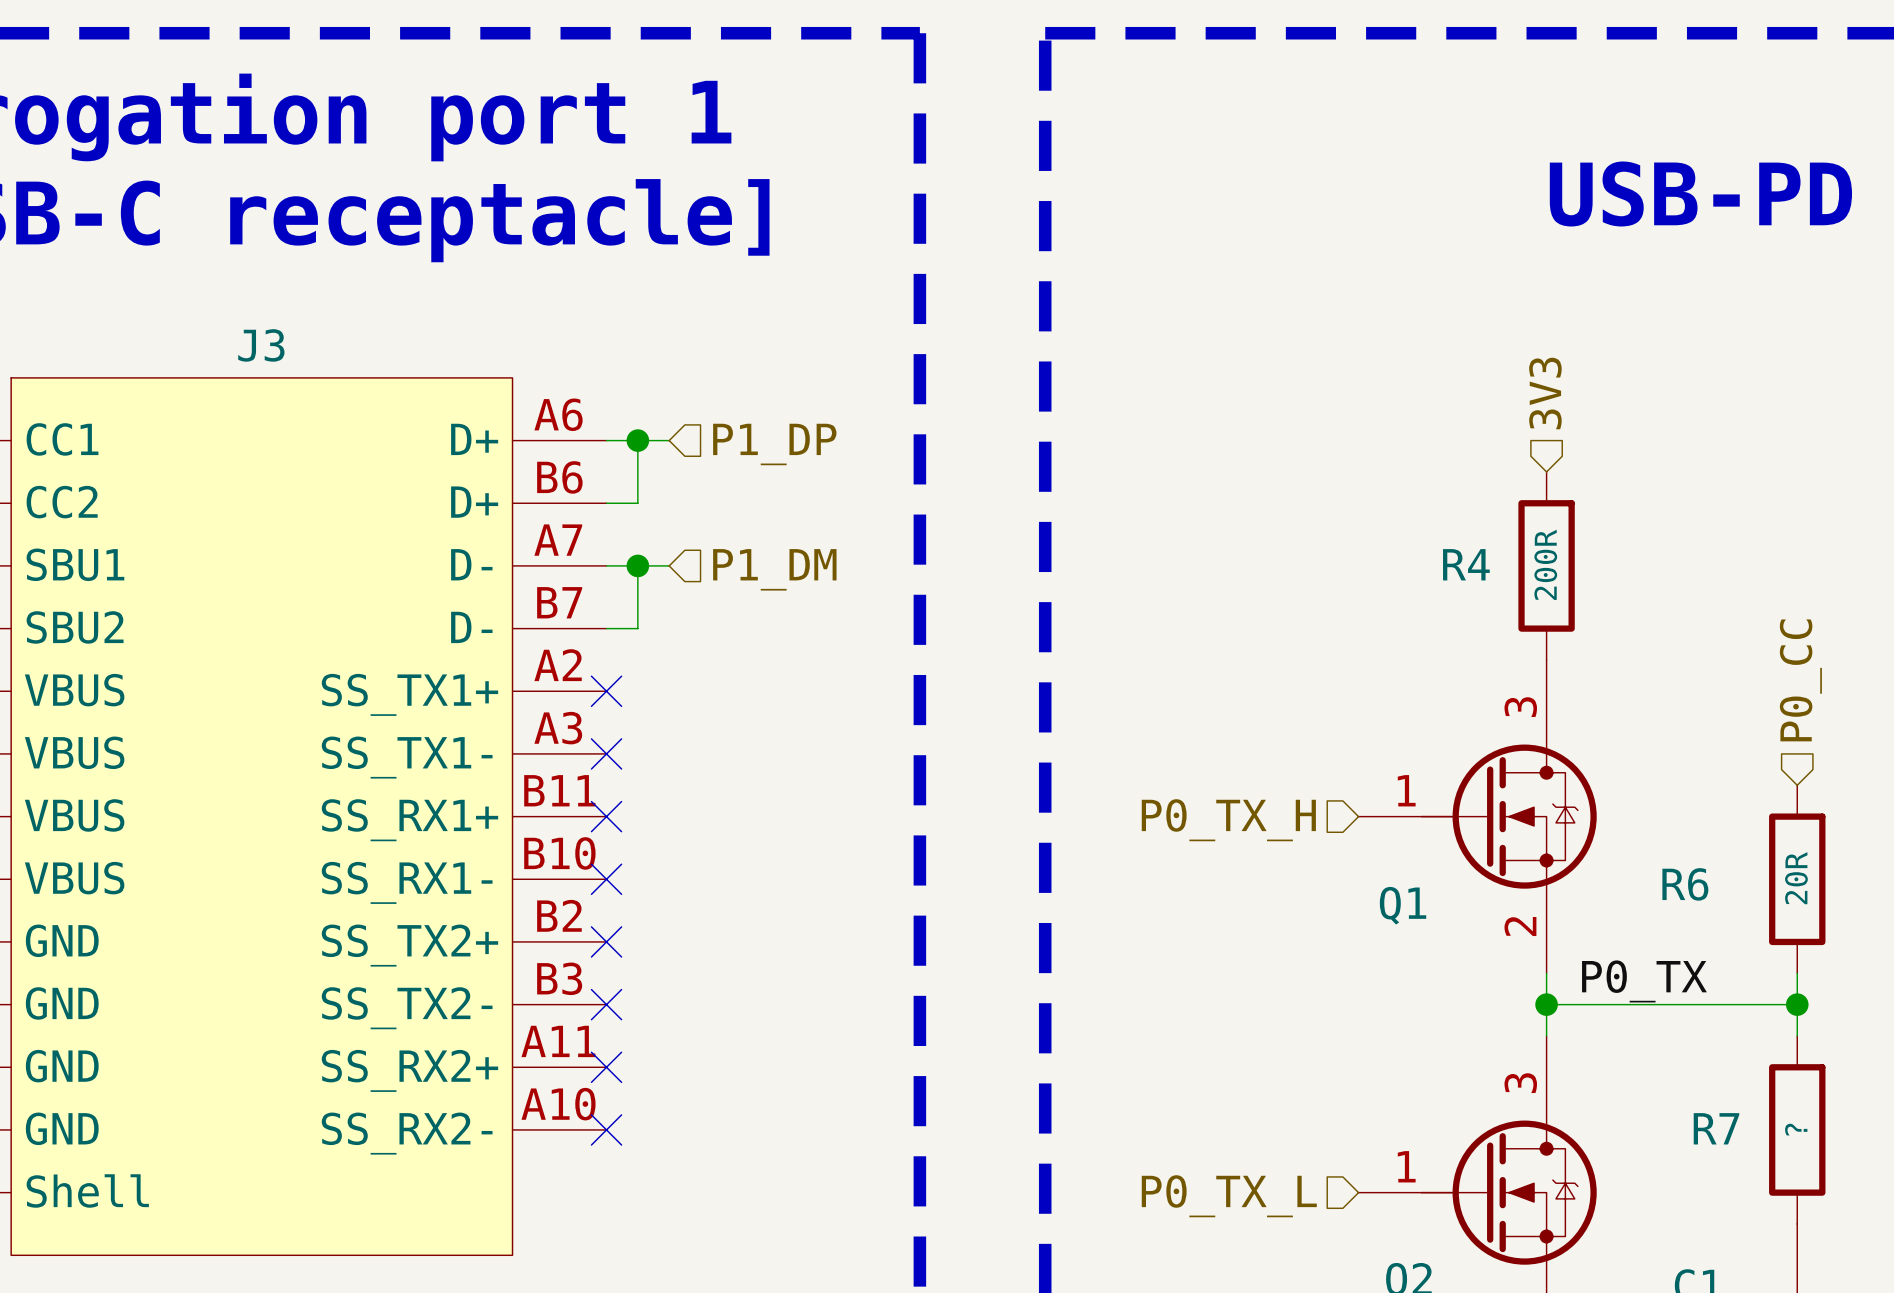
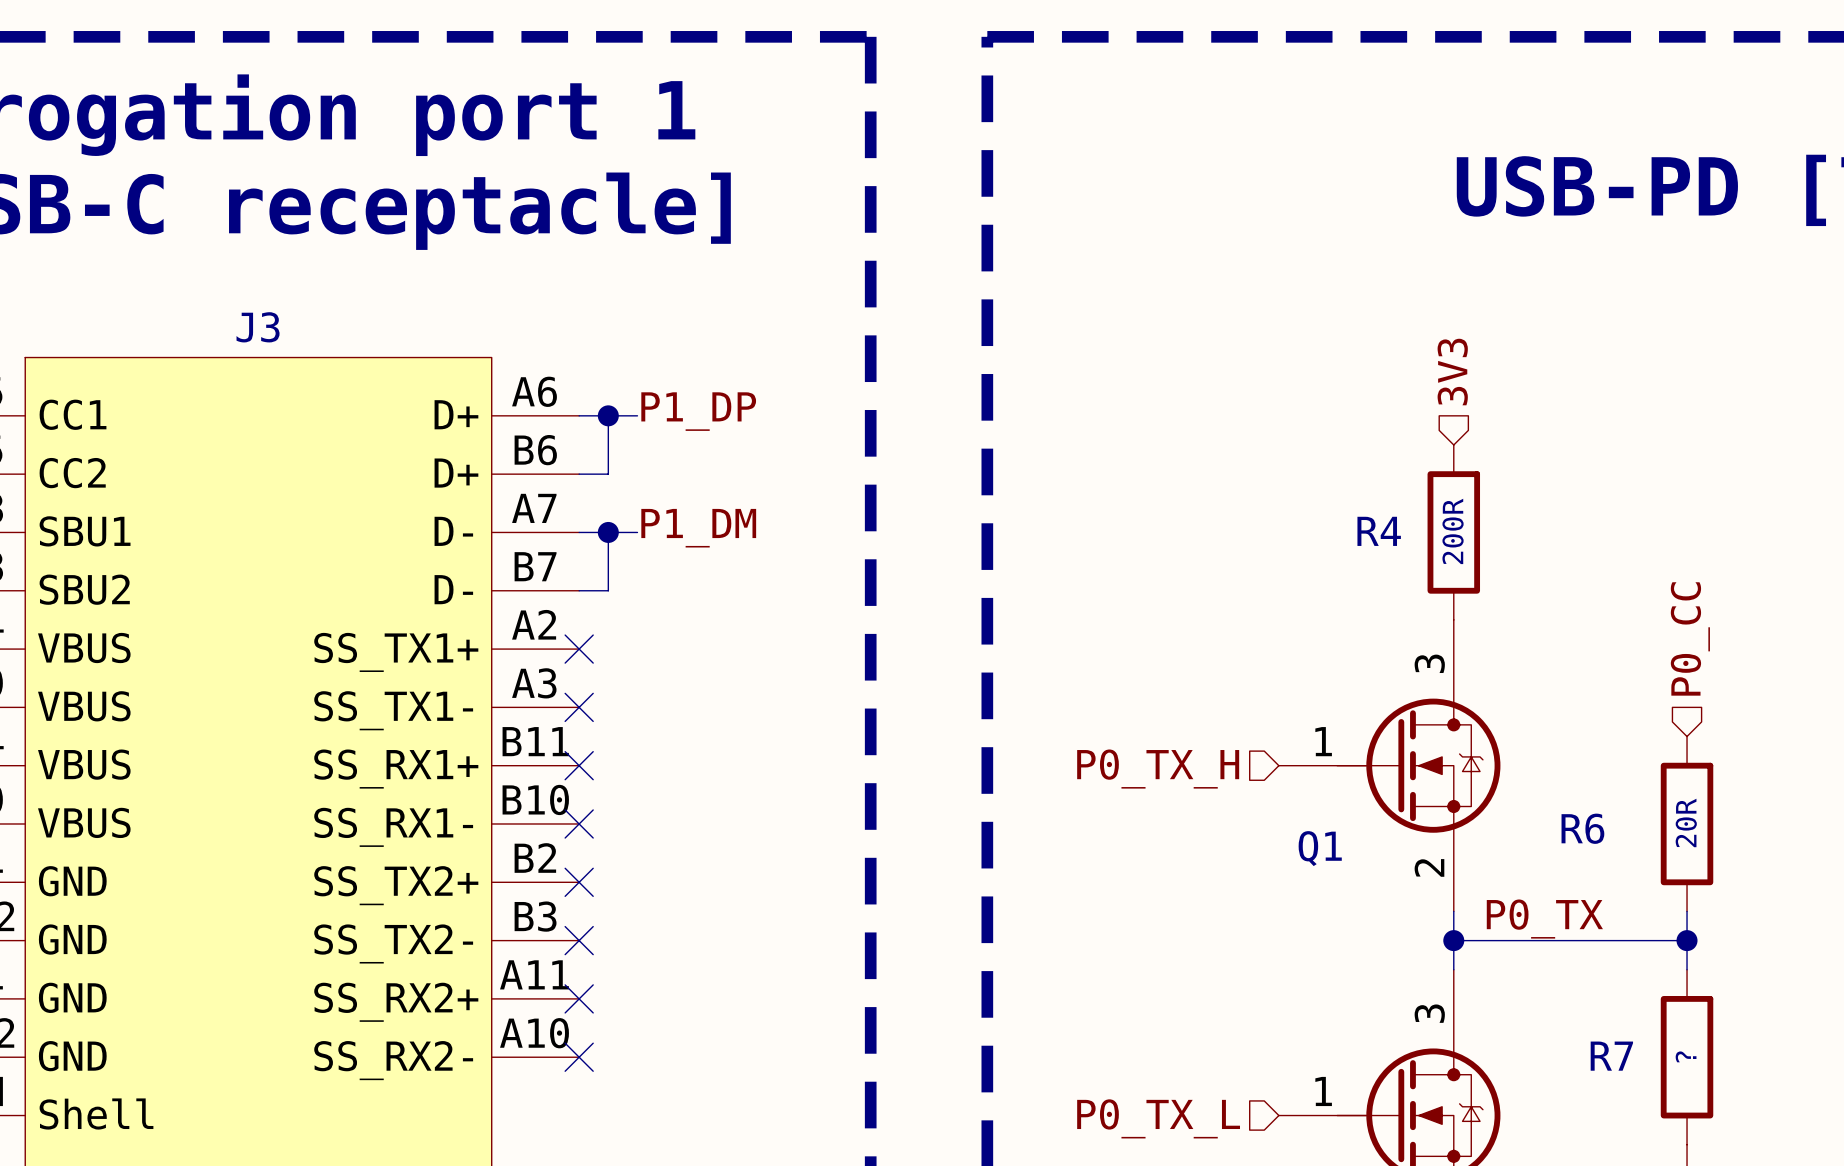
label: none -> P1_DP (698, 411)
hierarchical label: P1_DP (774, 444) -> none
label: none -> P1_DM (698, 528)
hierarchical label: P1_DM (774, 569) -> none

